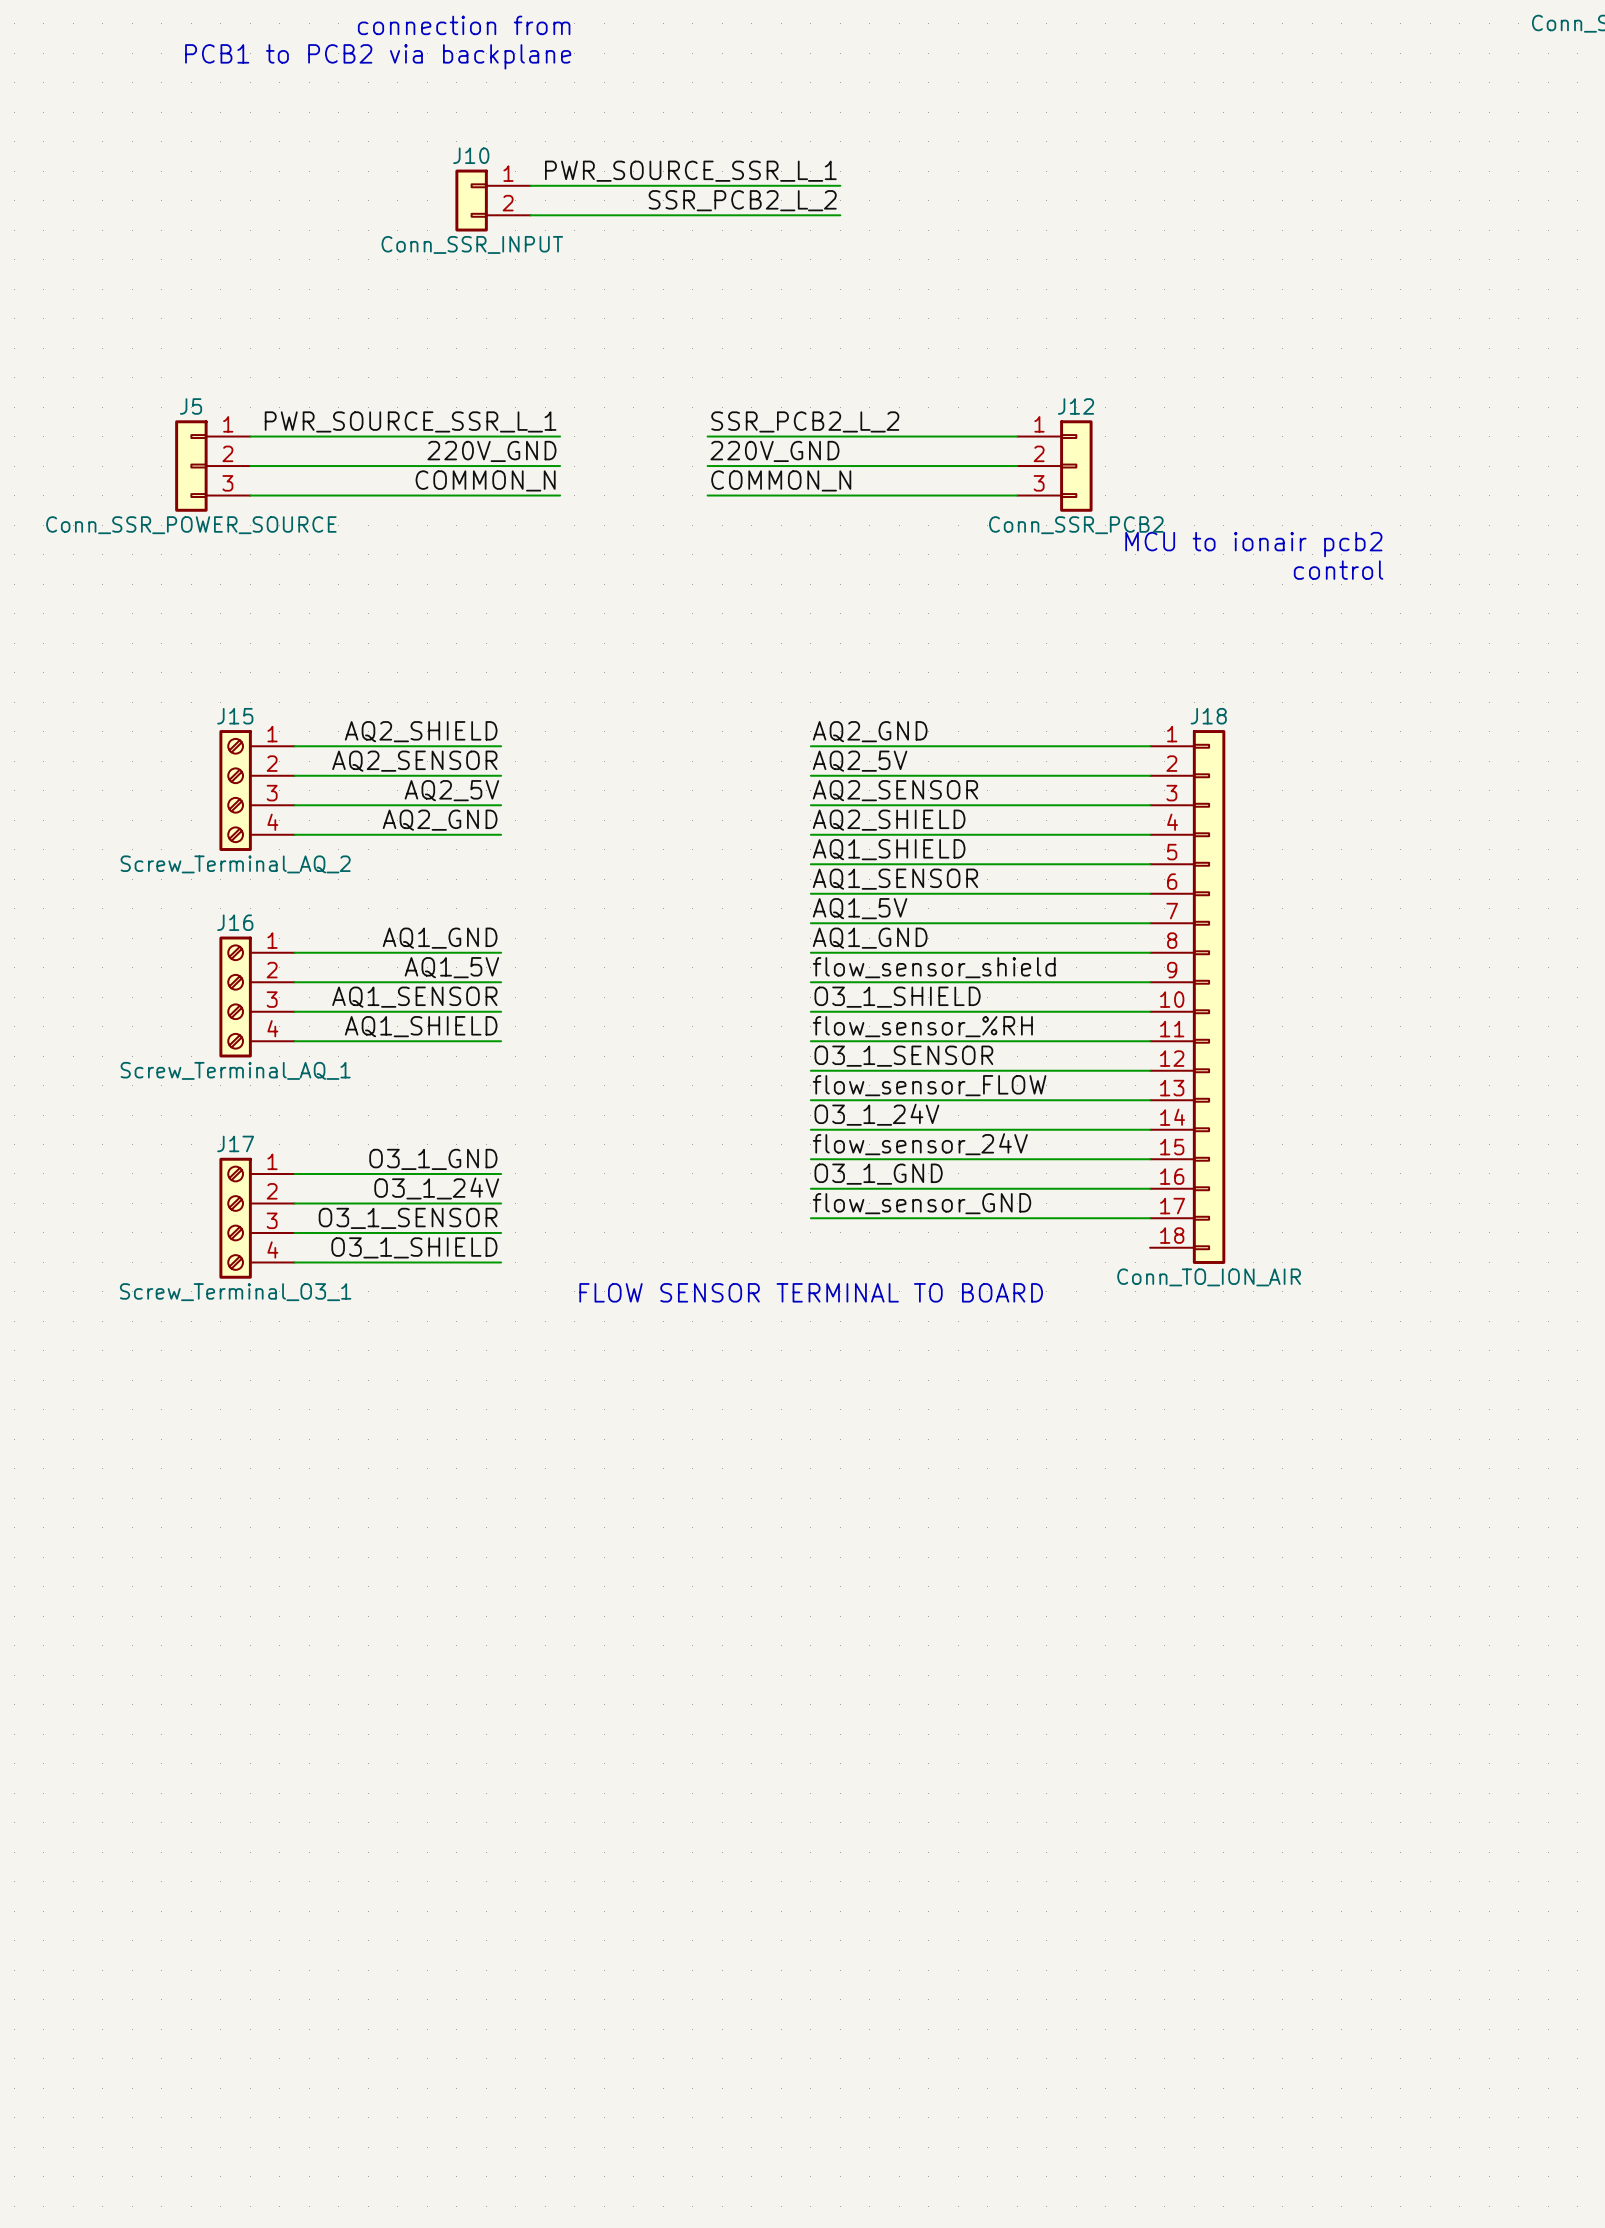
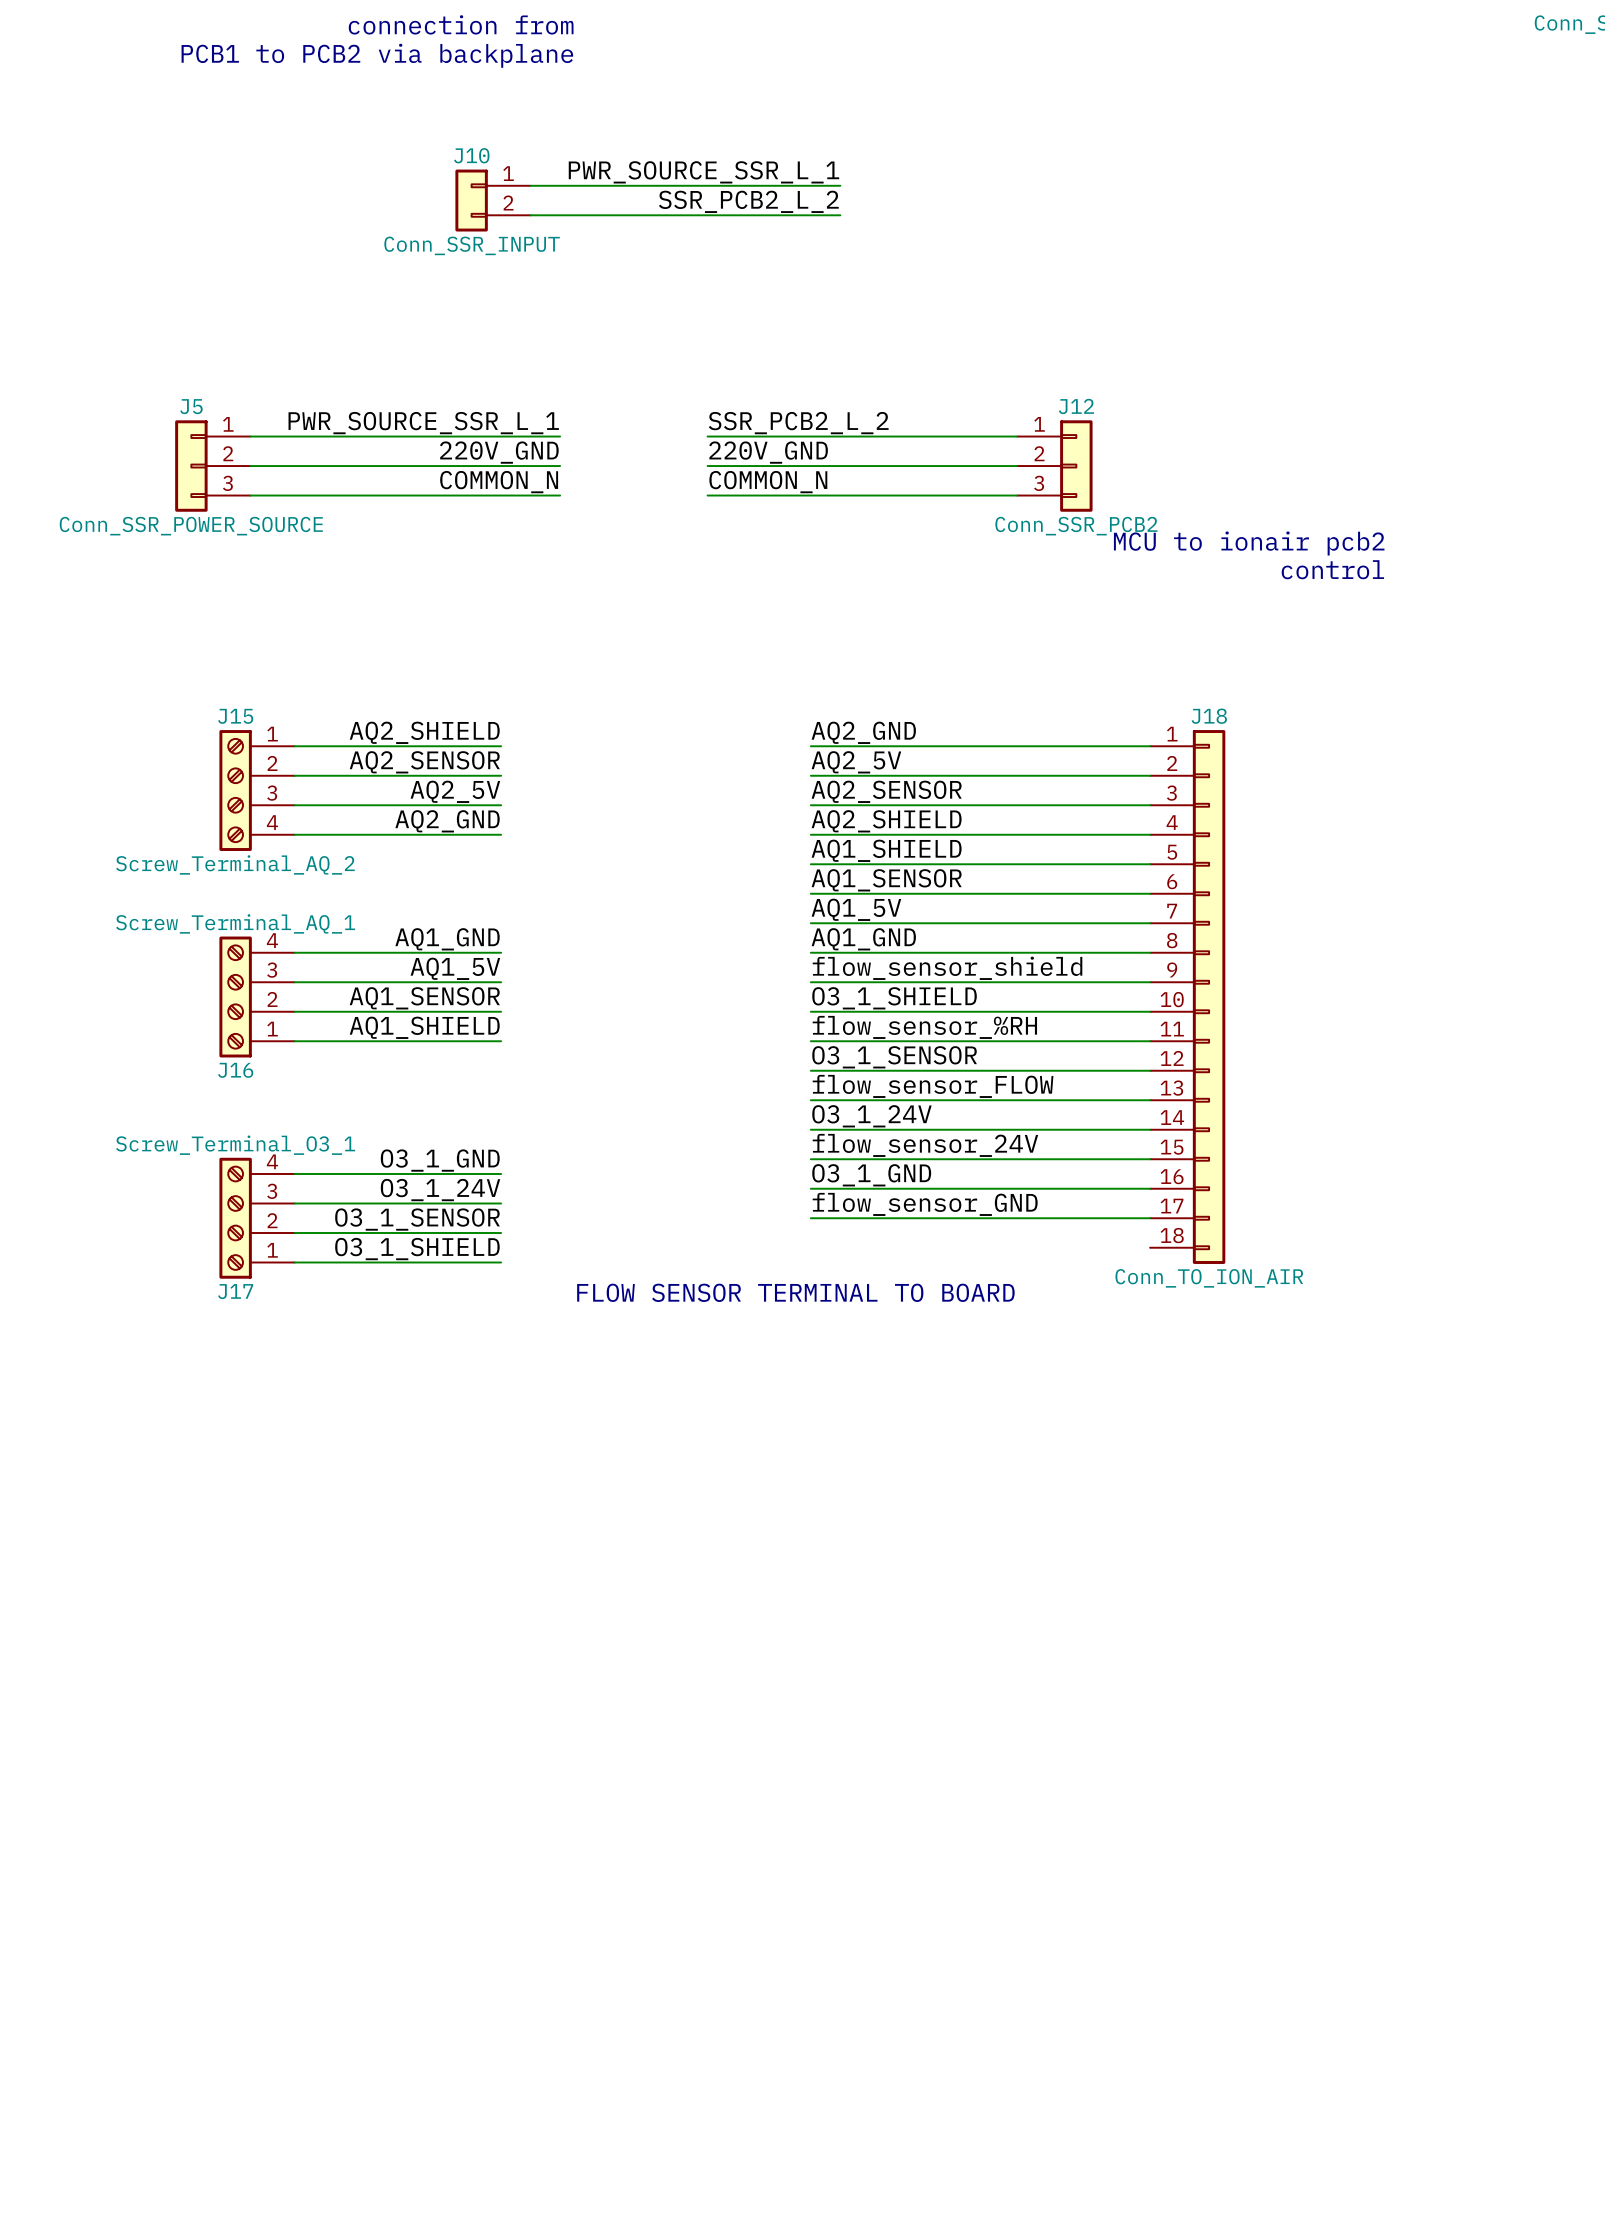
J16 flip: as is (235, 997) -> up-down (235, 997)
J17 flip: as is (235, 1218) -> up-down (235, 1218)

